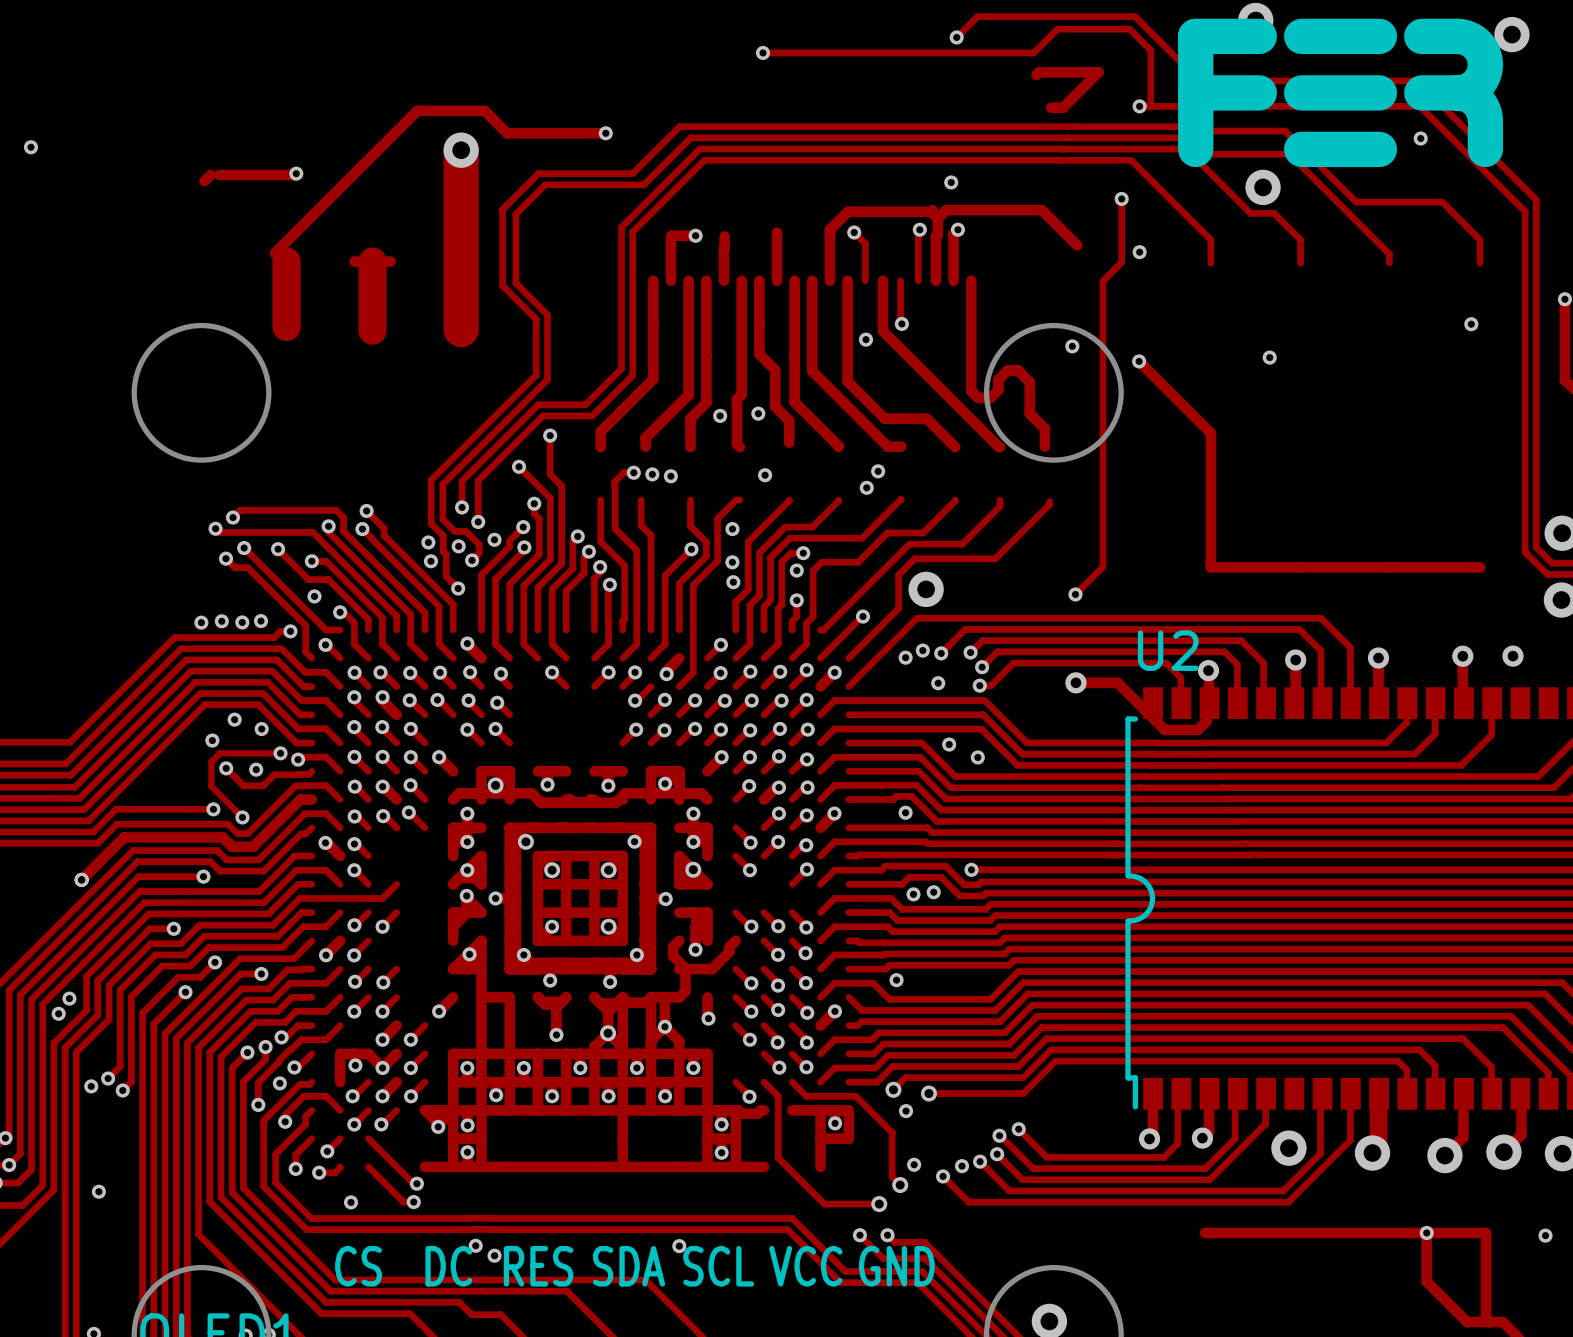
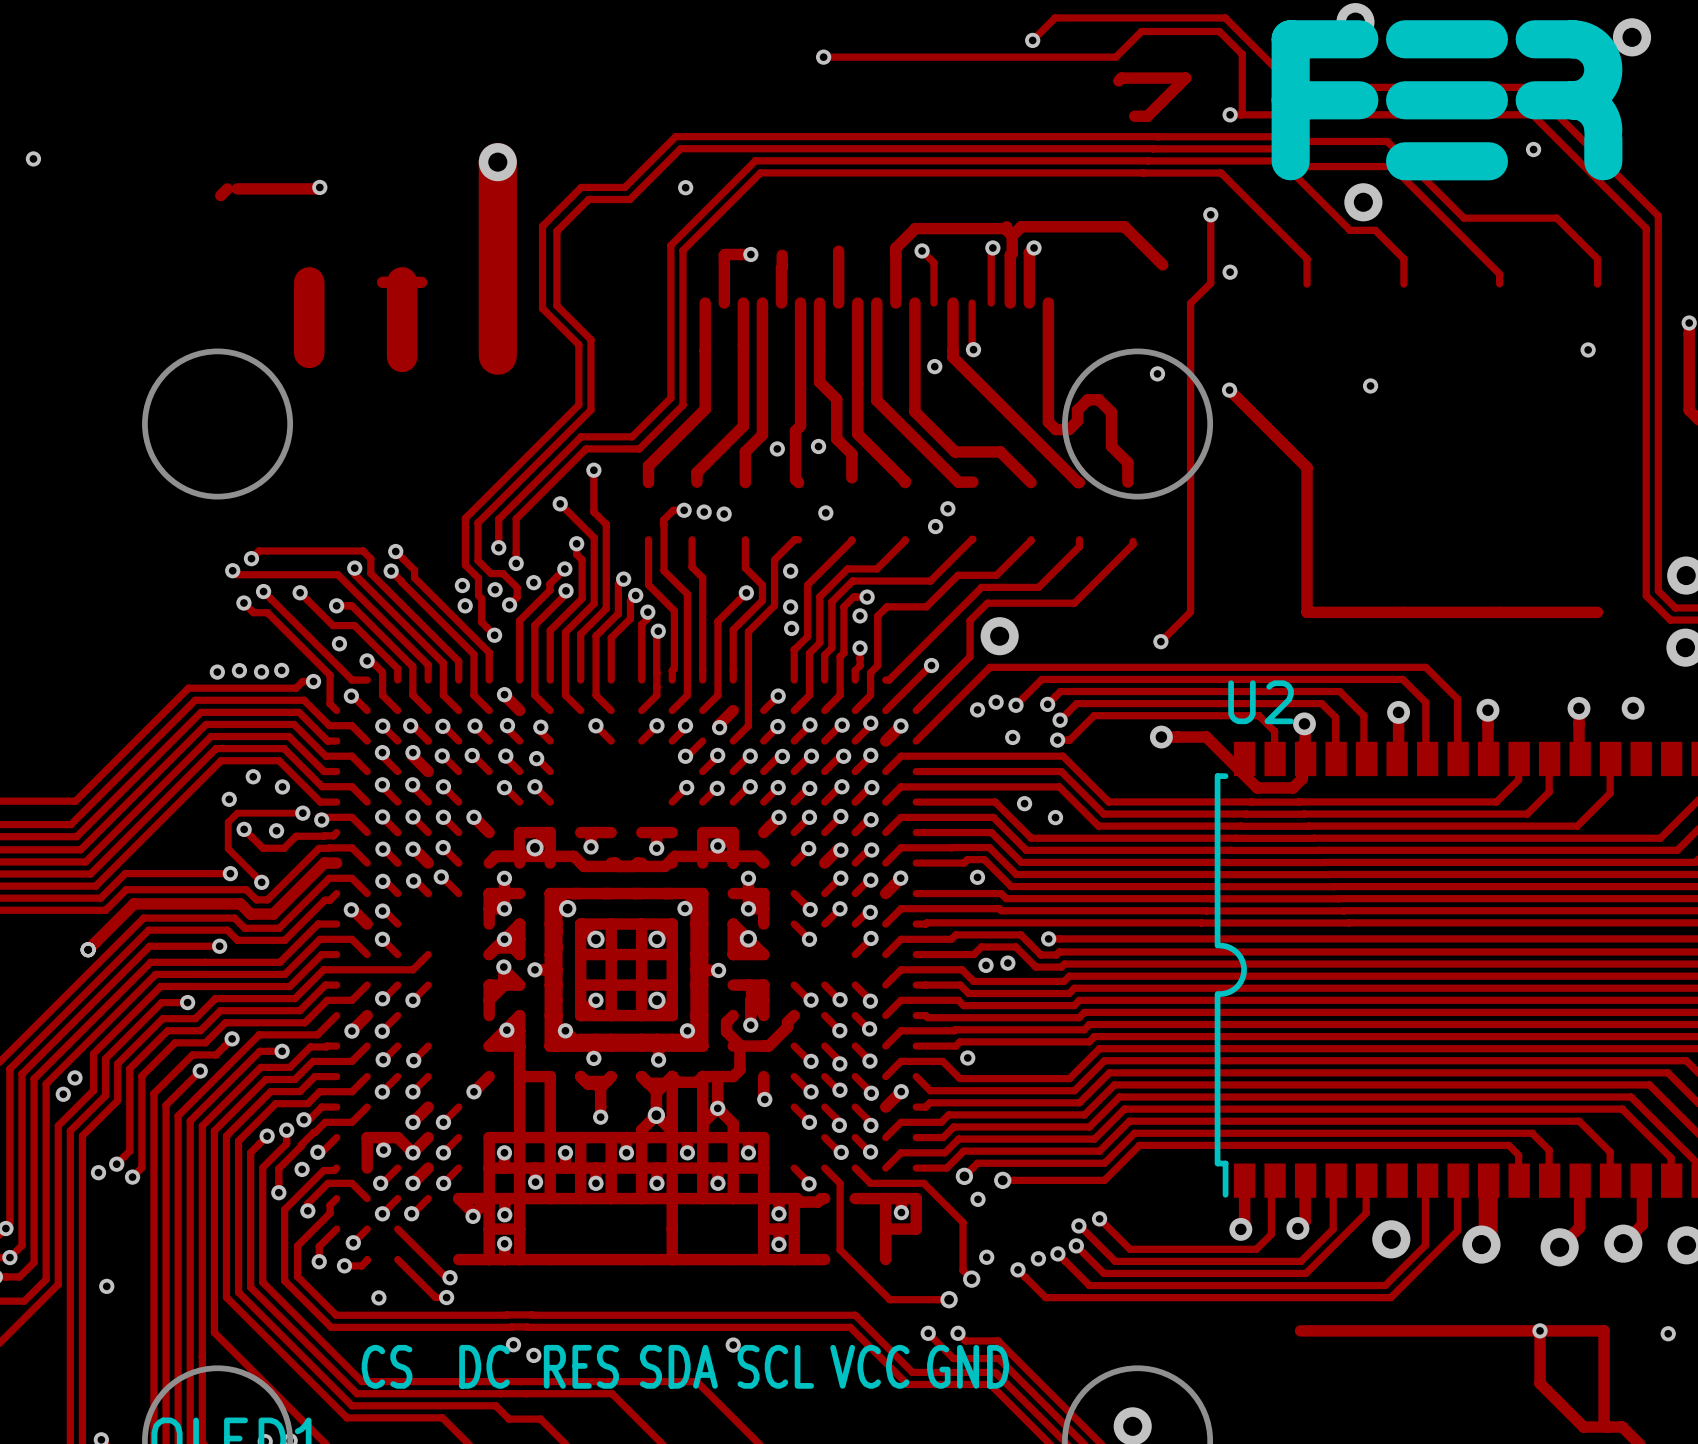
track: (679, 126) (632, 173) (578, 173) -> (733, 136) (675, 136) (624, 187)
track: (605, 133) (507, 133) (484, 110) (417, 110) (275, 254) -> none
via position: (605, 133) -> (685, 187)
track: (691, 137) (643, 184) (583, 184) -> (745, 148) (680, 148) (629, 199)
via: (951, 182) -> none

